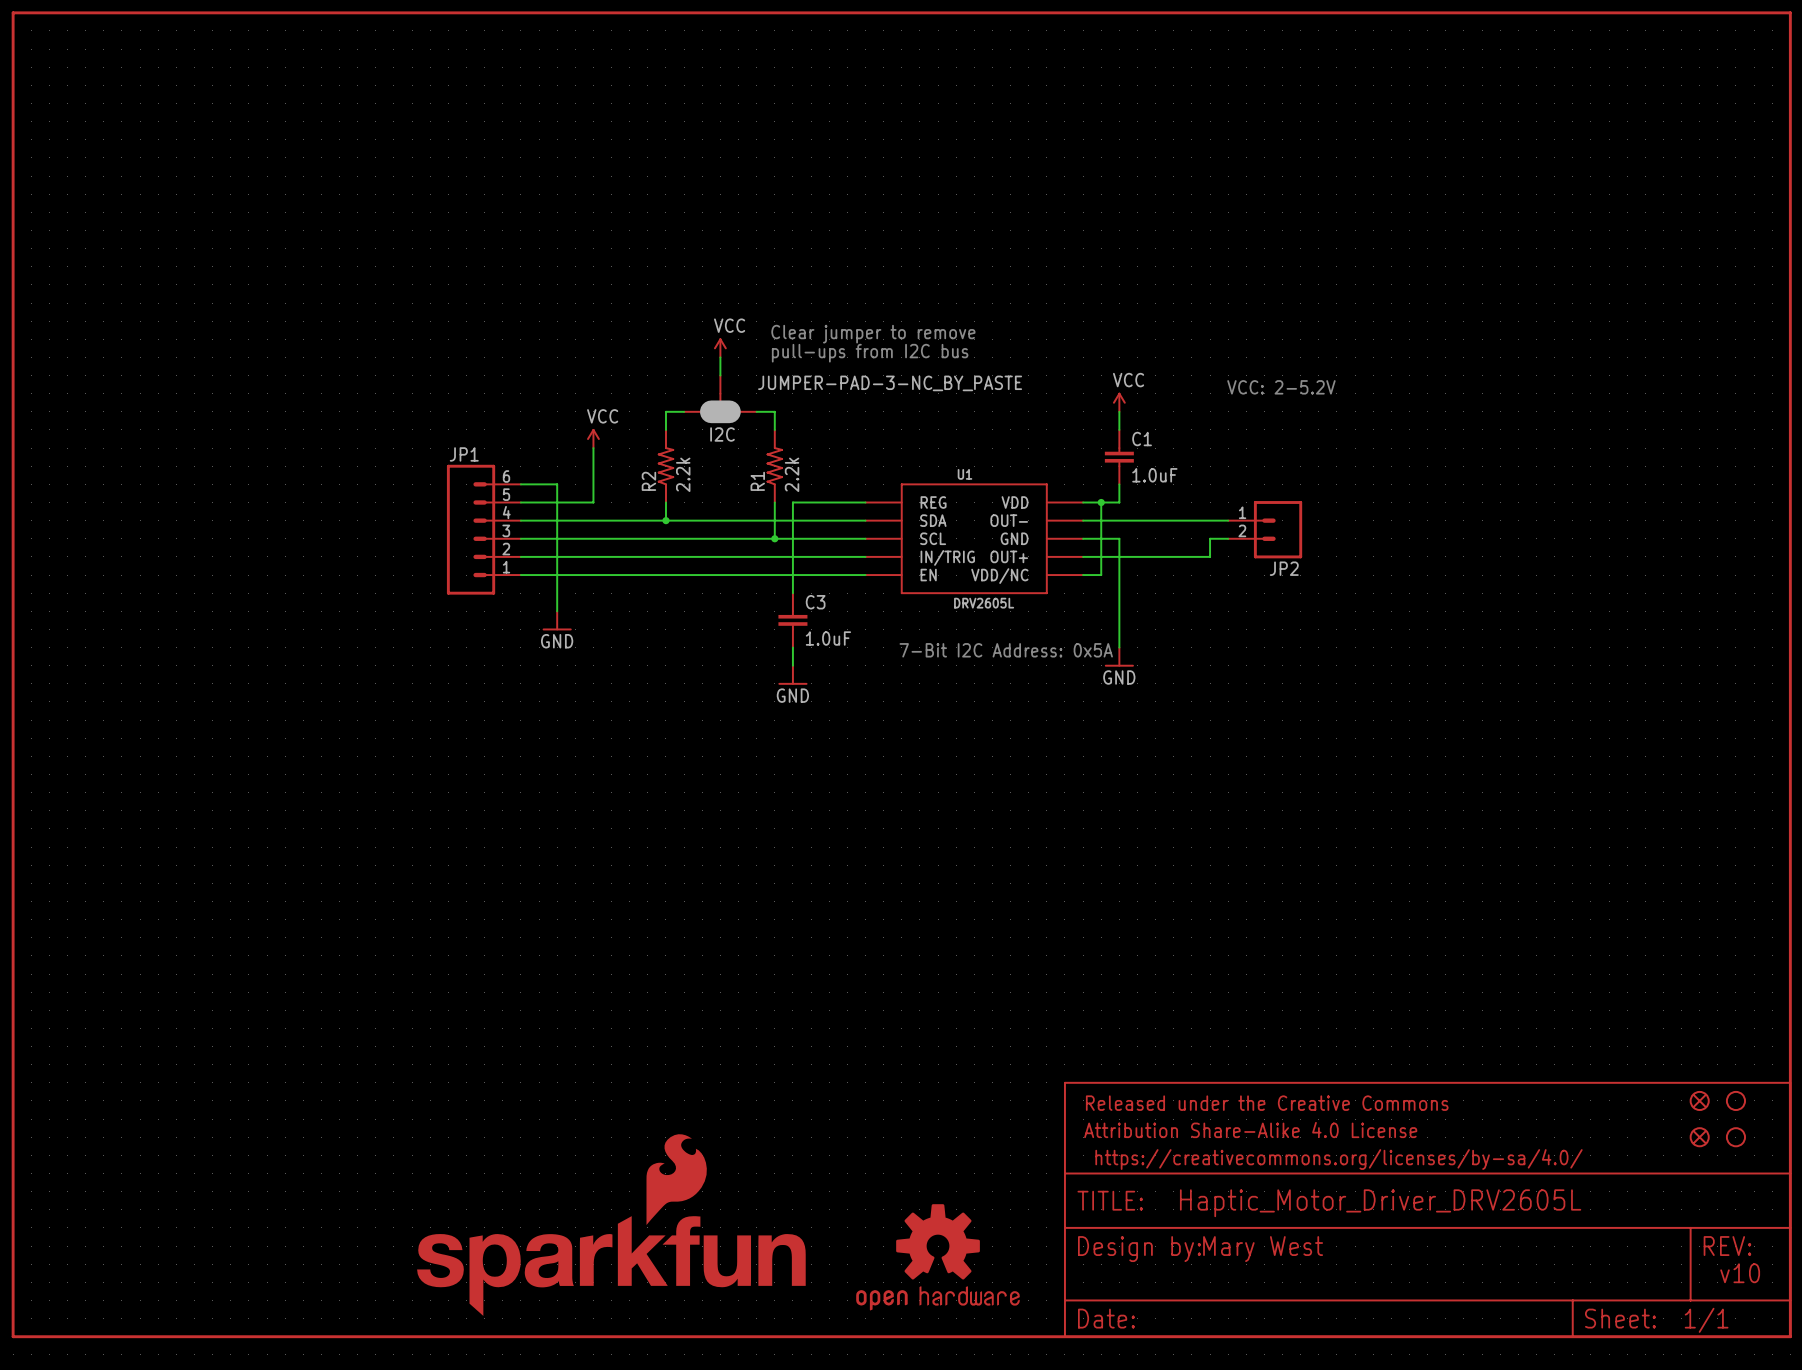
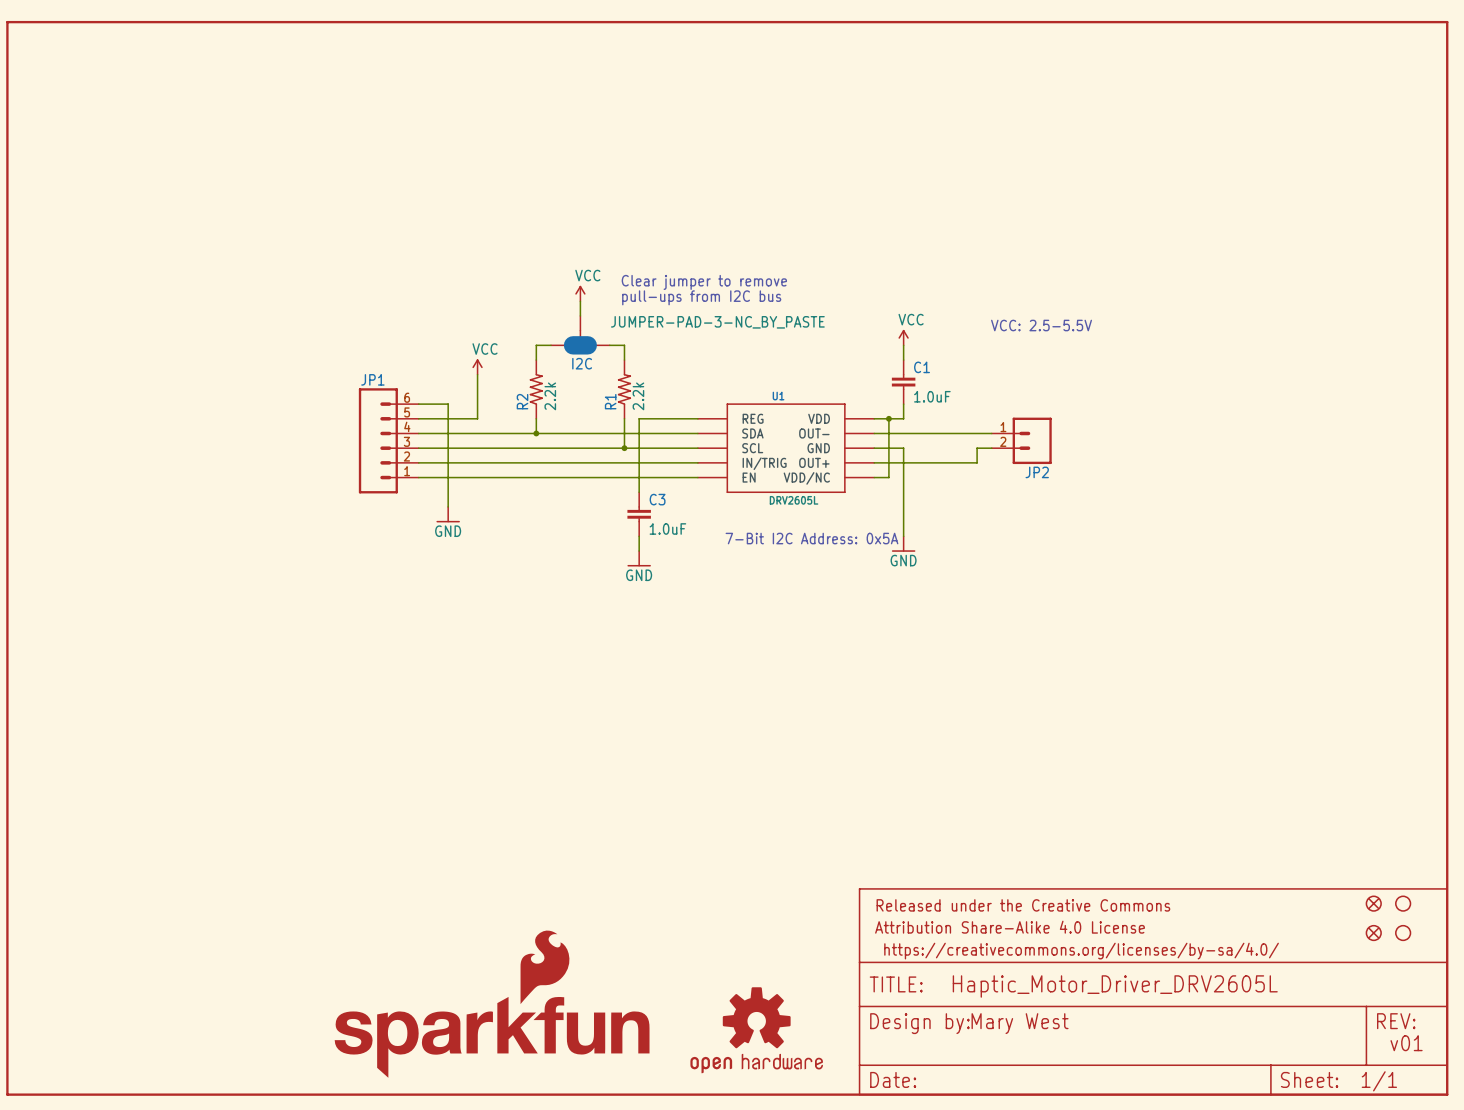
text: VCC: 2-5.2V (1281, 387) -> VCC: 2.5-5.5V (1041, 325)
text: v10 (1740, 1273) -> v01 (1406, 1043)

